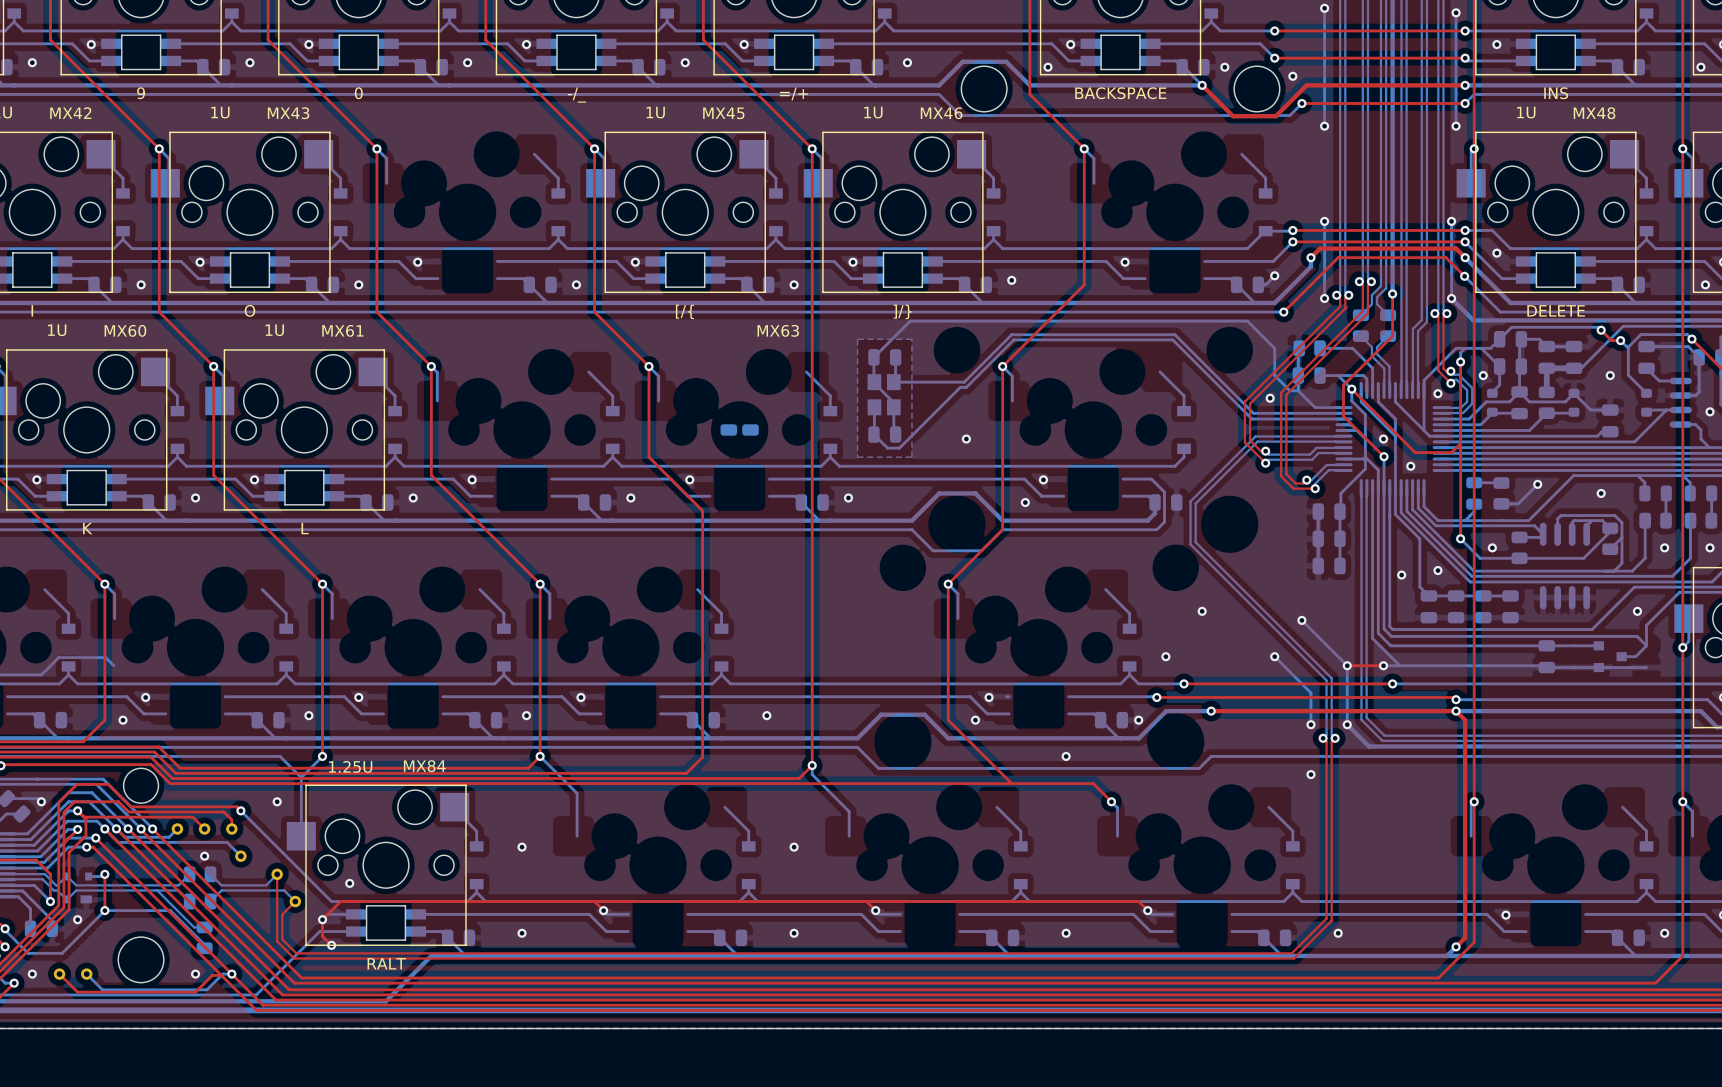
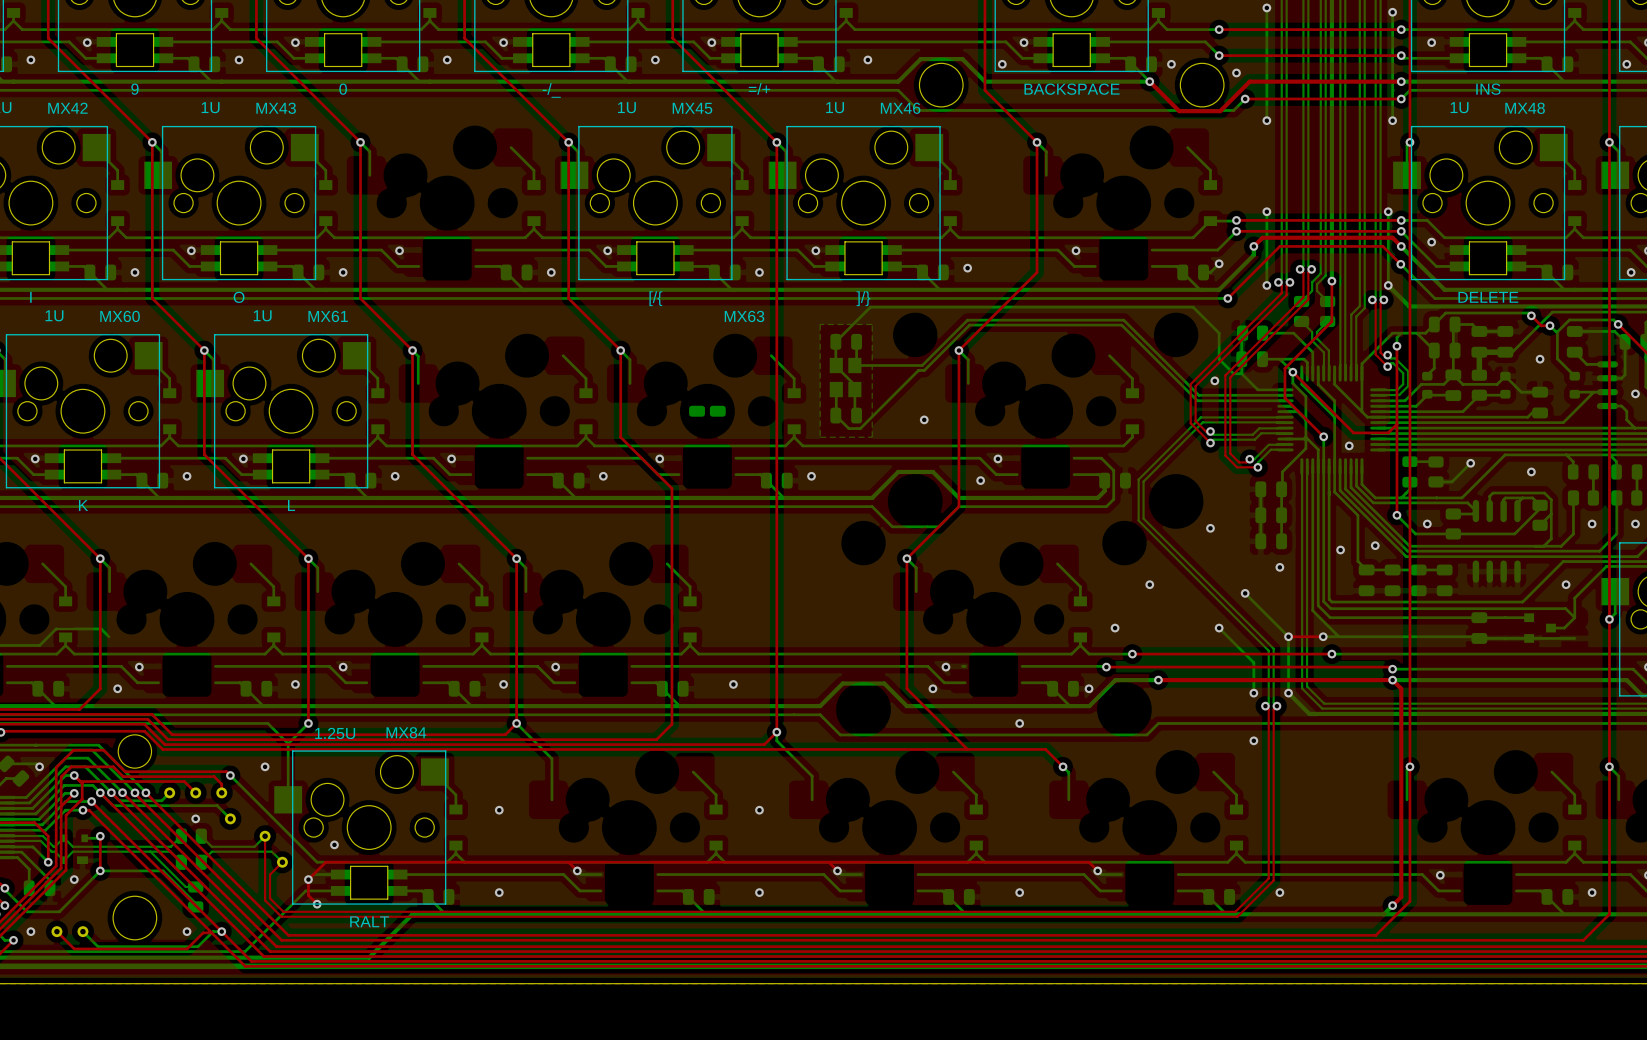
via: (1483, 375) -> none
via: (1437, 393) -> none
via: (1383, 439) -> none
via: none -> (1210, 528)
via: none -> (1279, 567)

